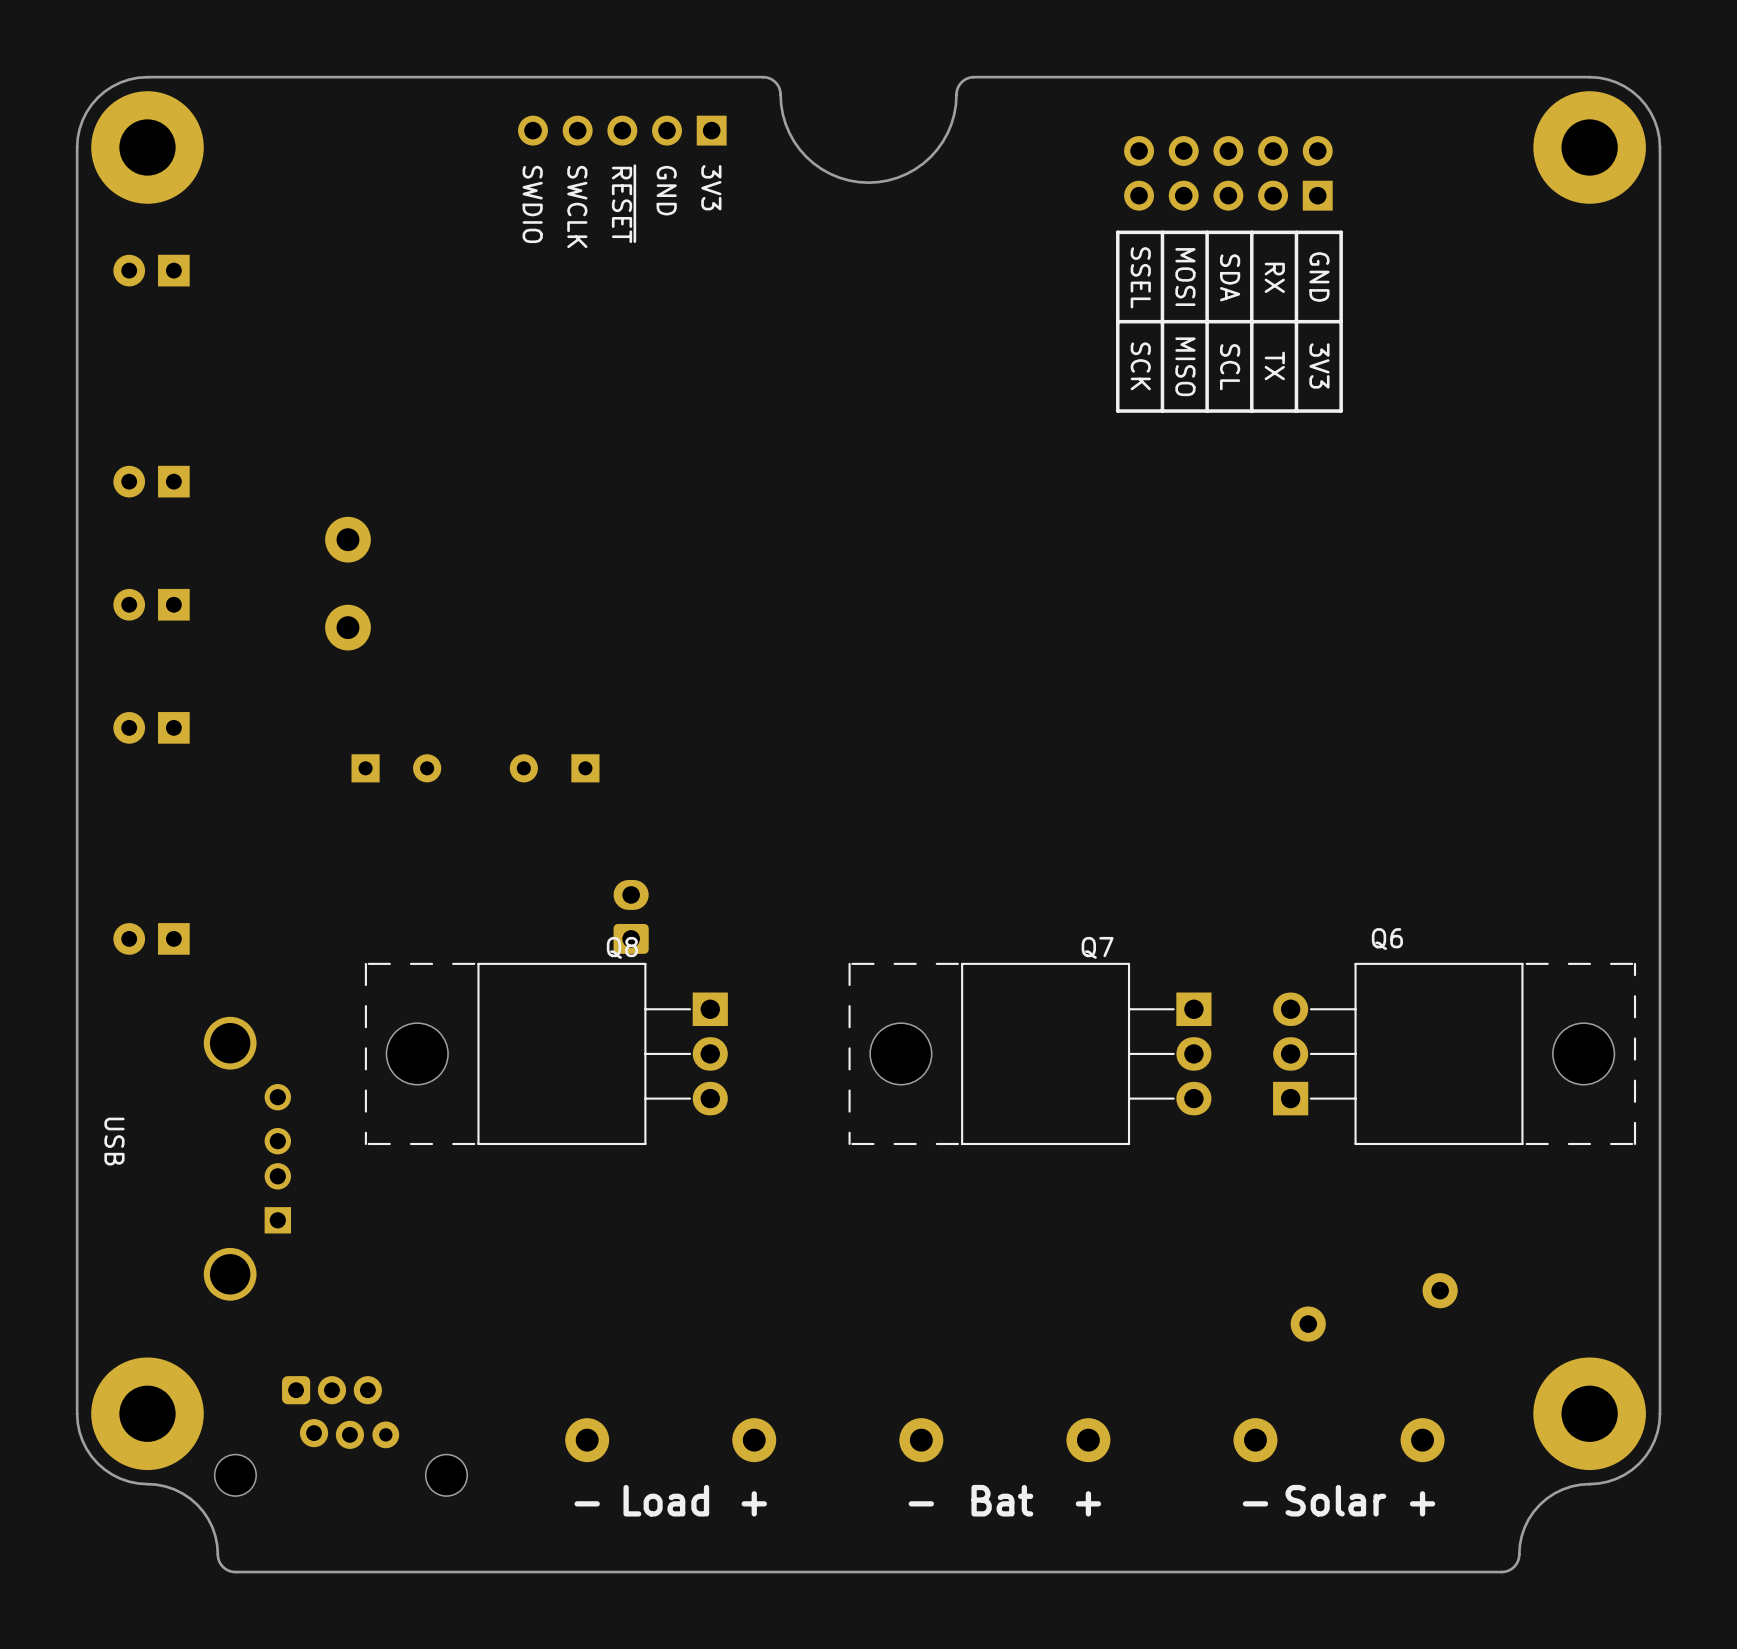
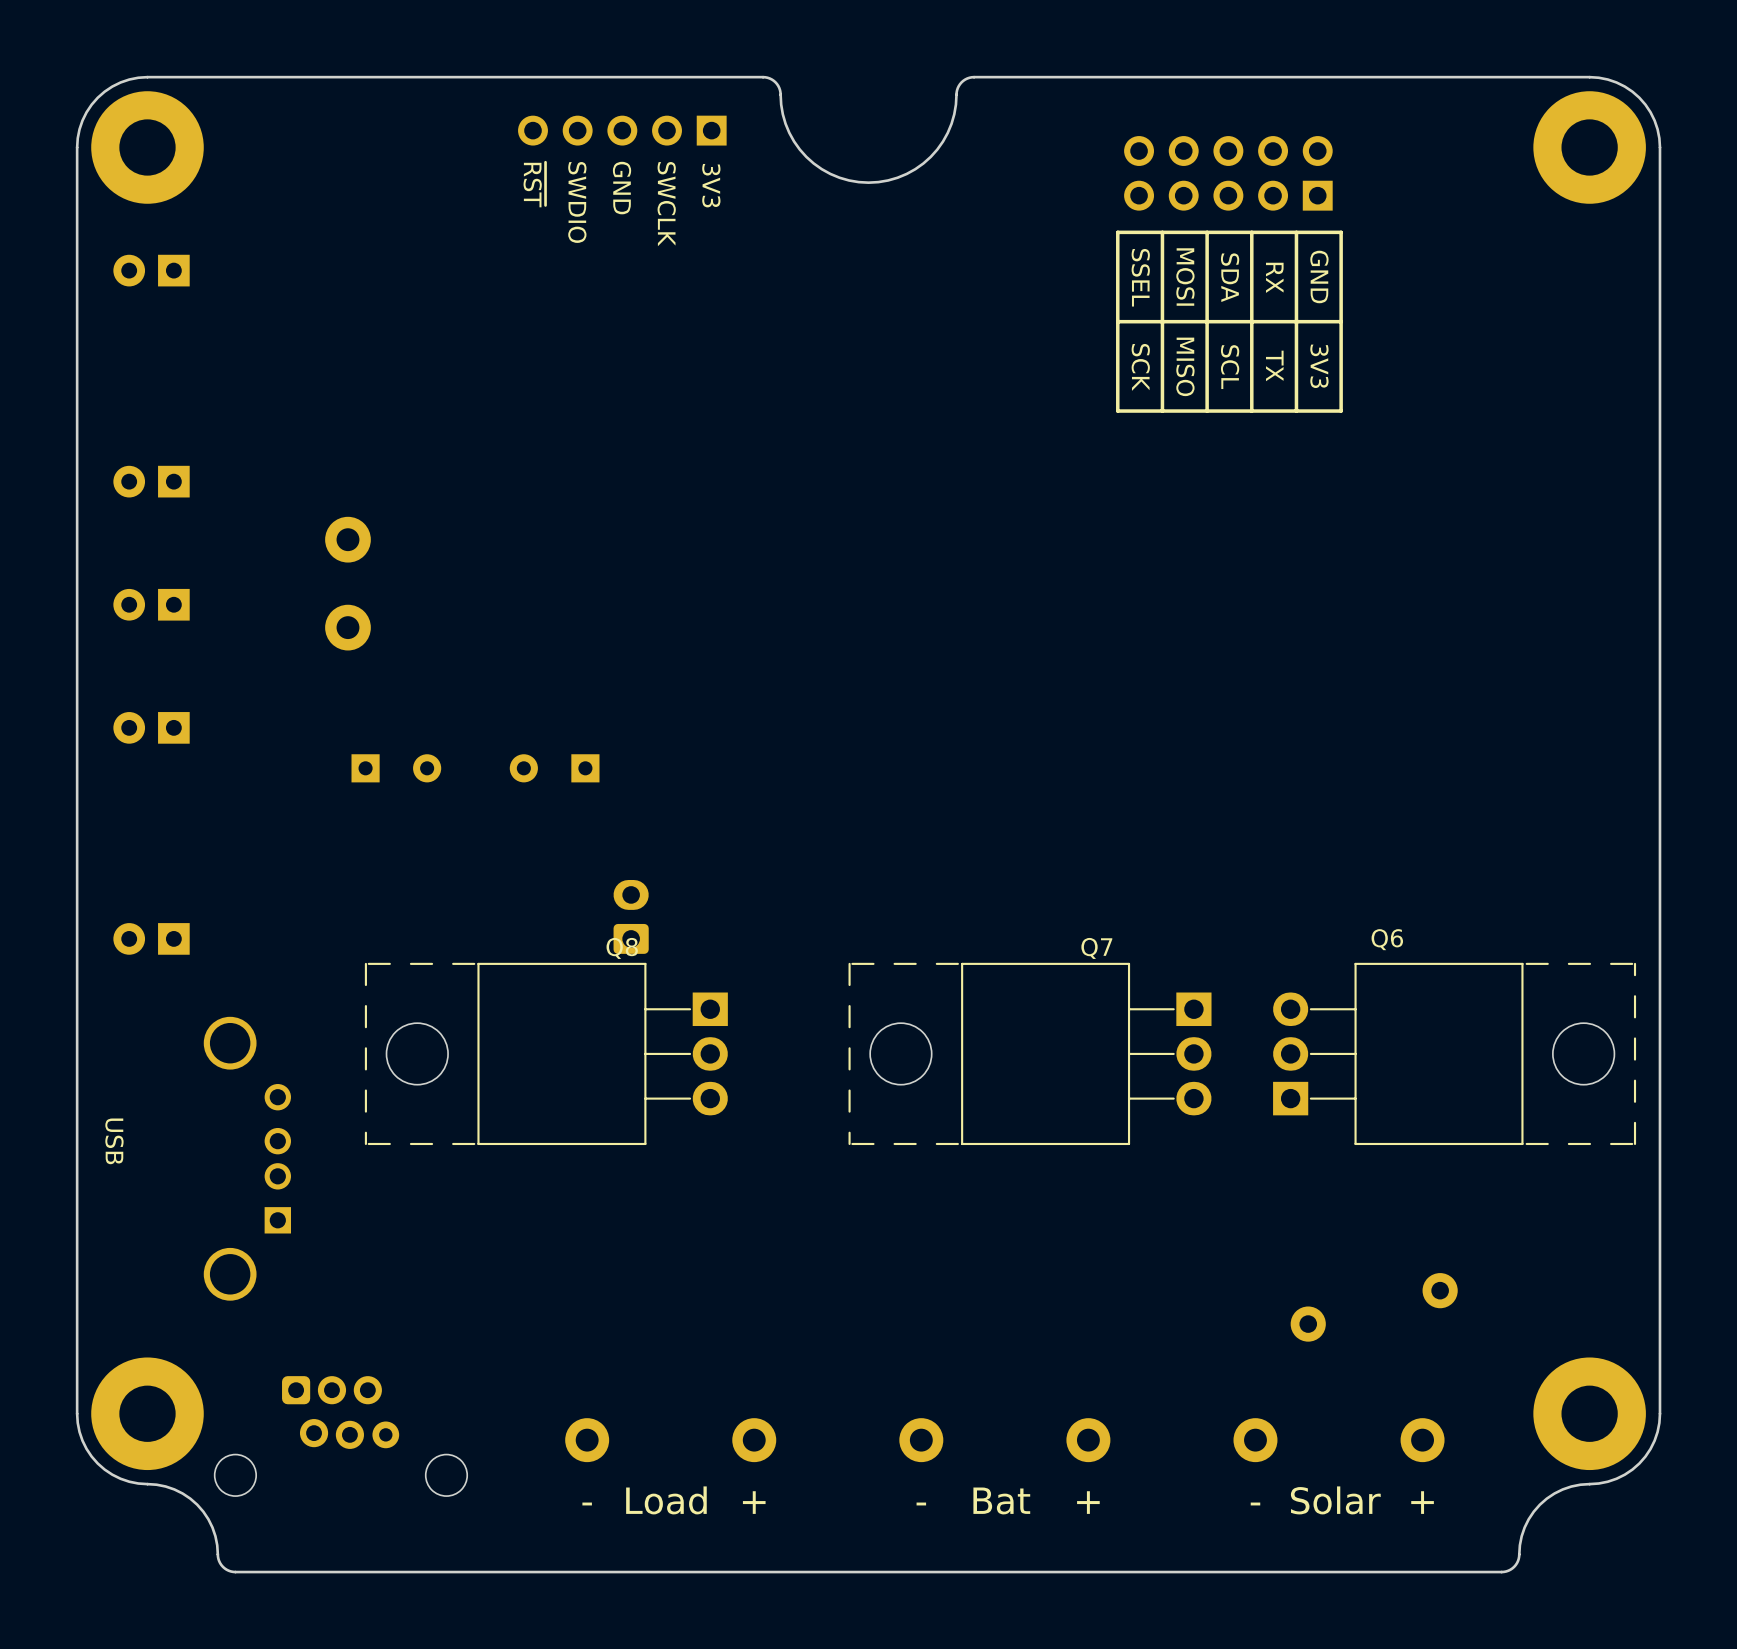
text: GND (666, 190) -> SWCLK (666, 204)
text: ~{RESET} (624, 203) -> GND (622, 188)
text: SWDIO (532, 204) -> ~{RST} (534, 184)
text: SWCLK (577, 206) -> SWDIO (577, 202)

